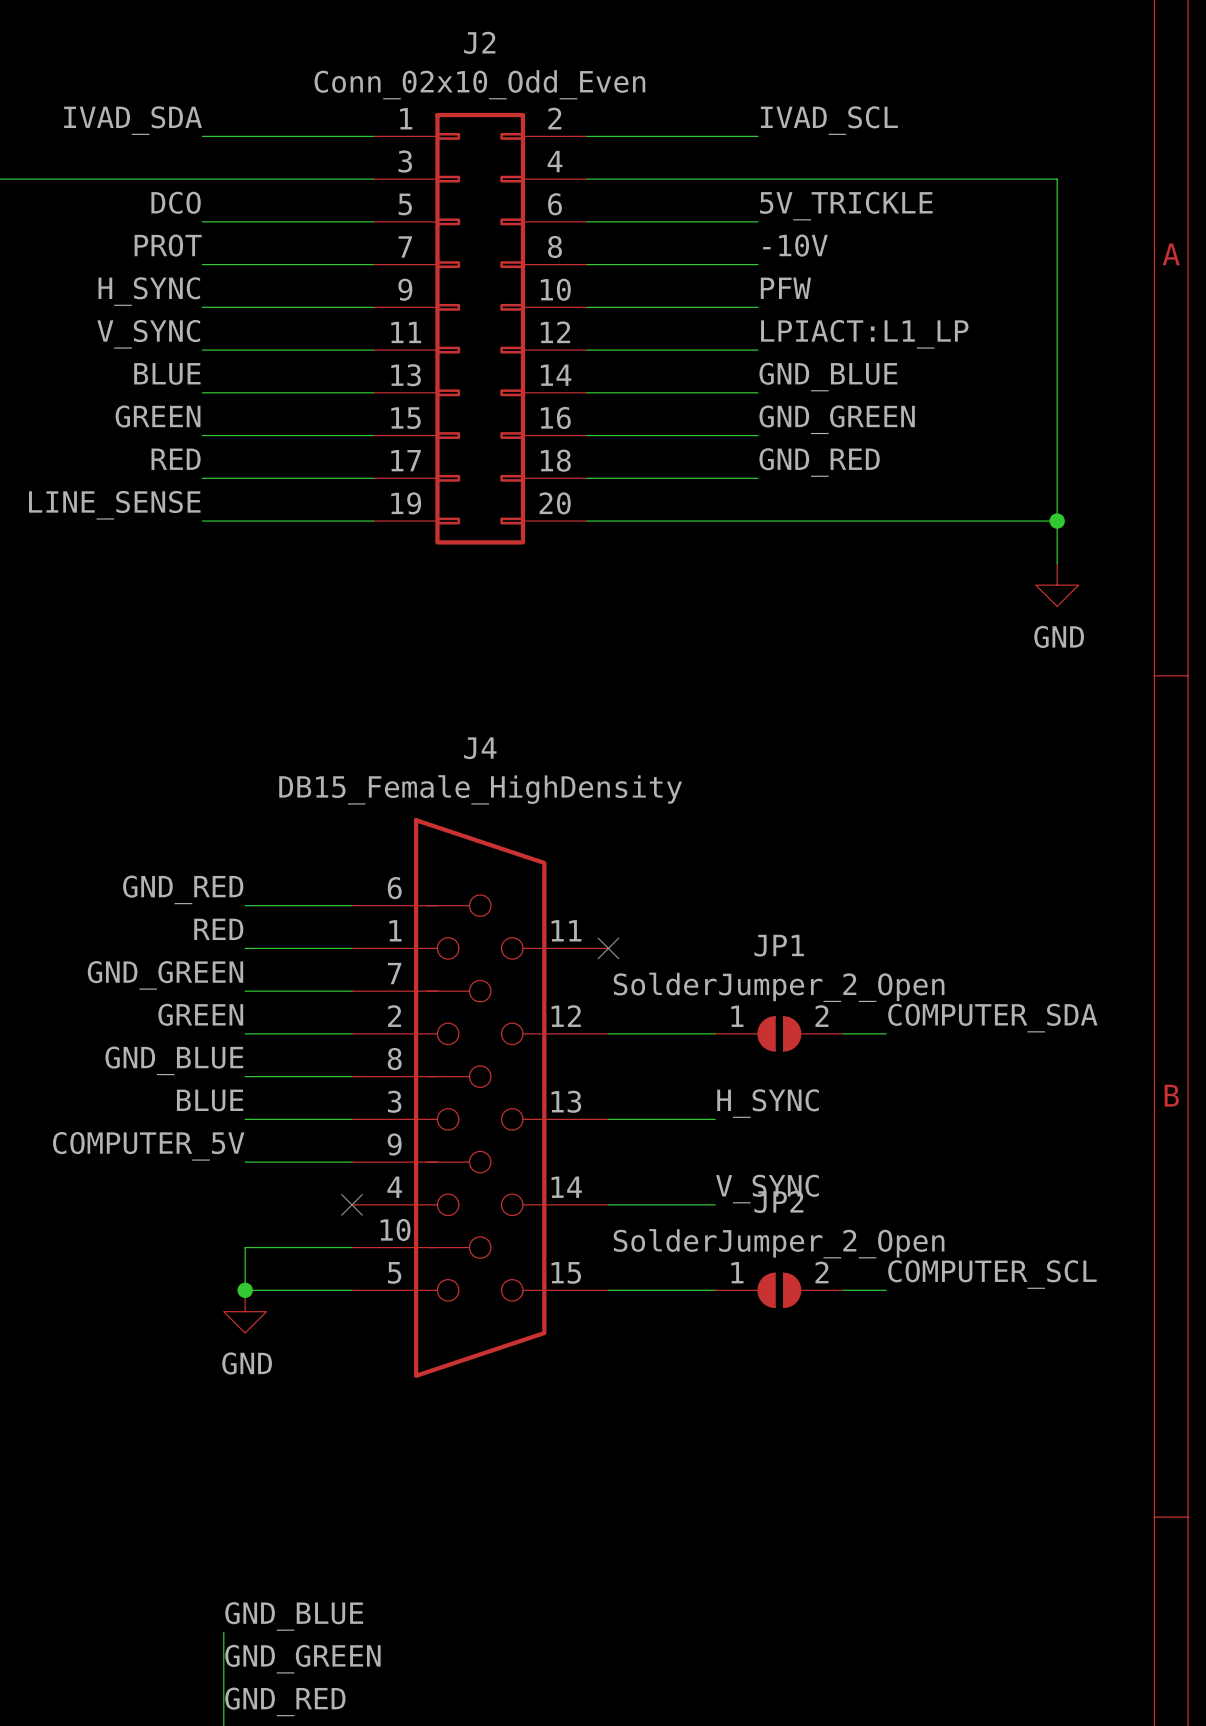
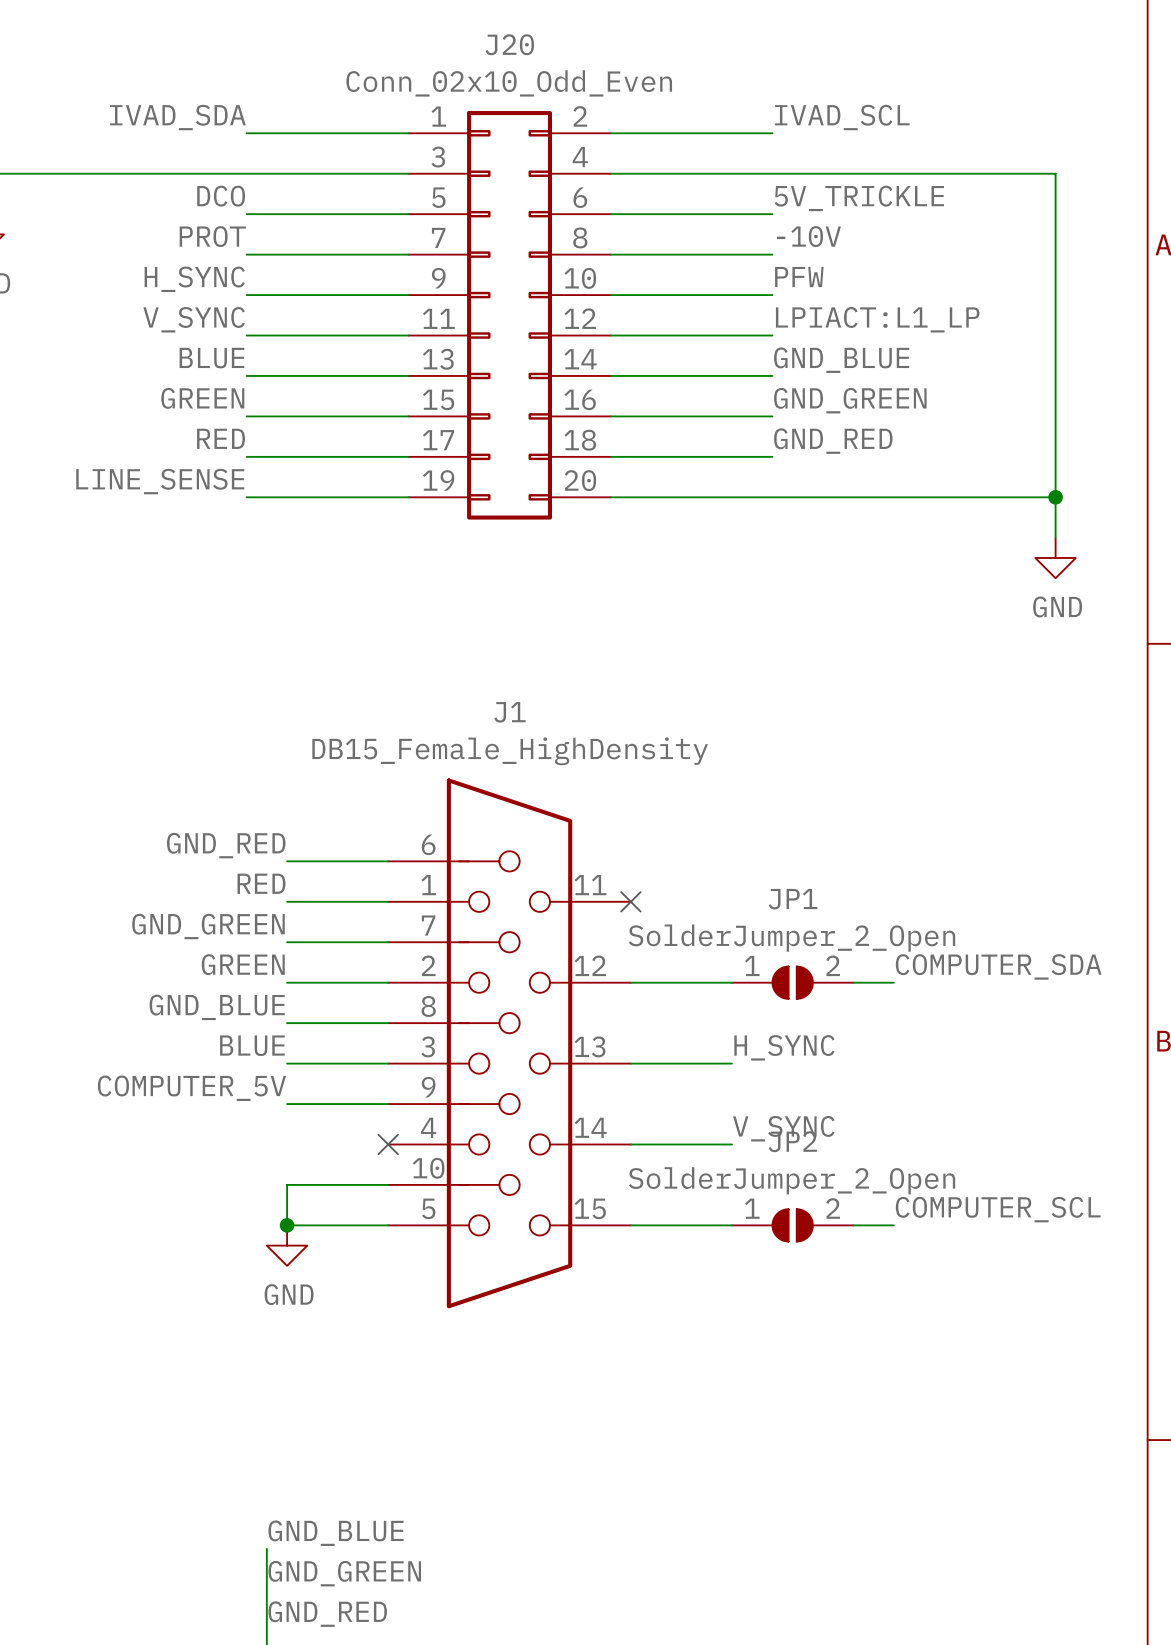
J2 name: J2 (479, 42) -> J20 (509, 44)
J4 name: J4 (480, 748) -> J1 (509, 712)

